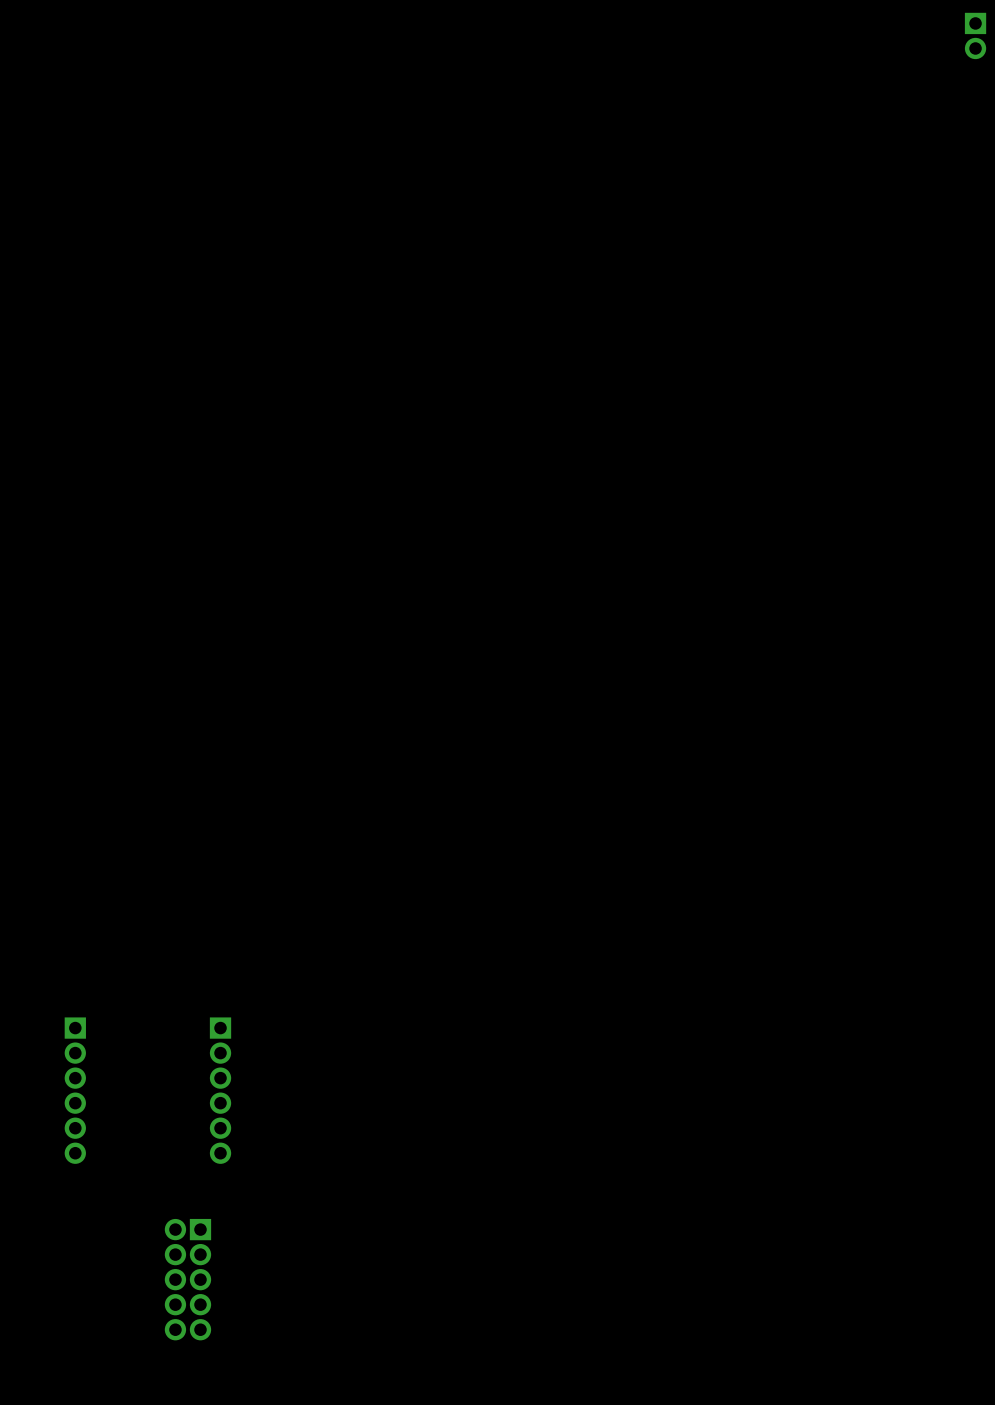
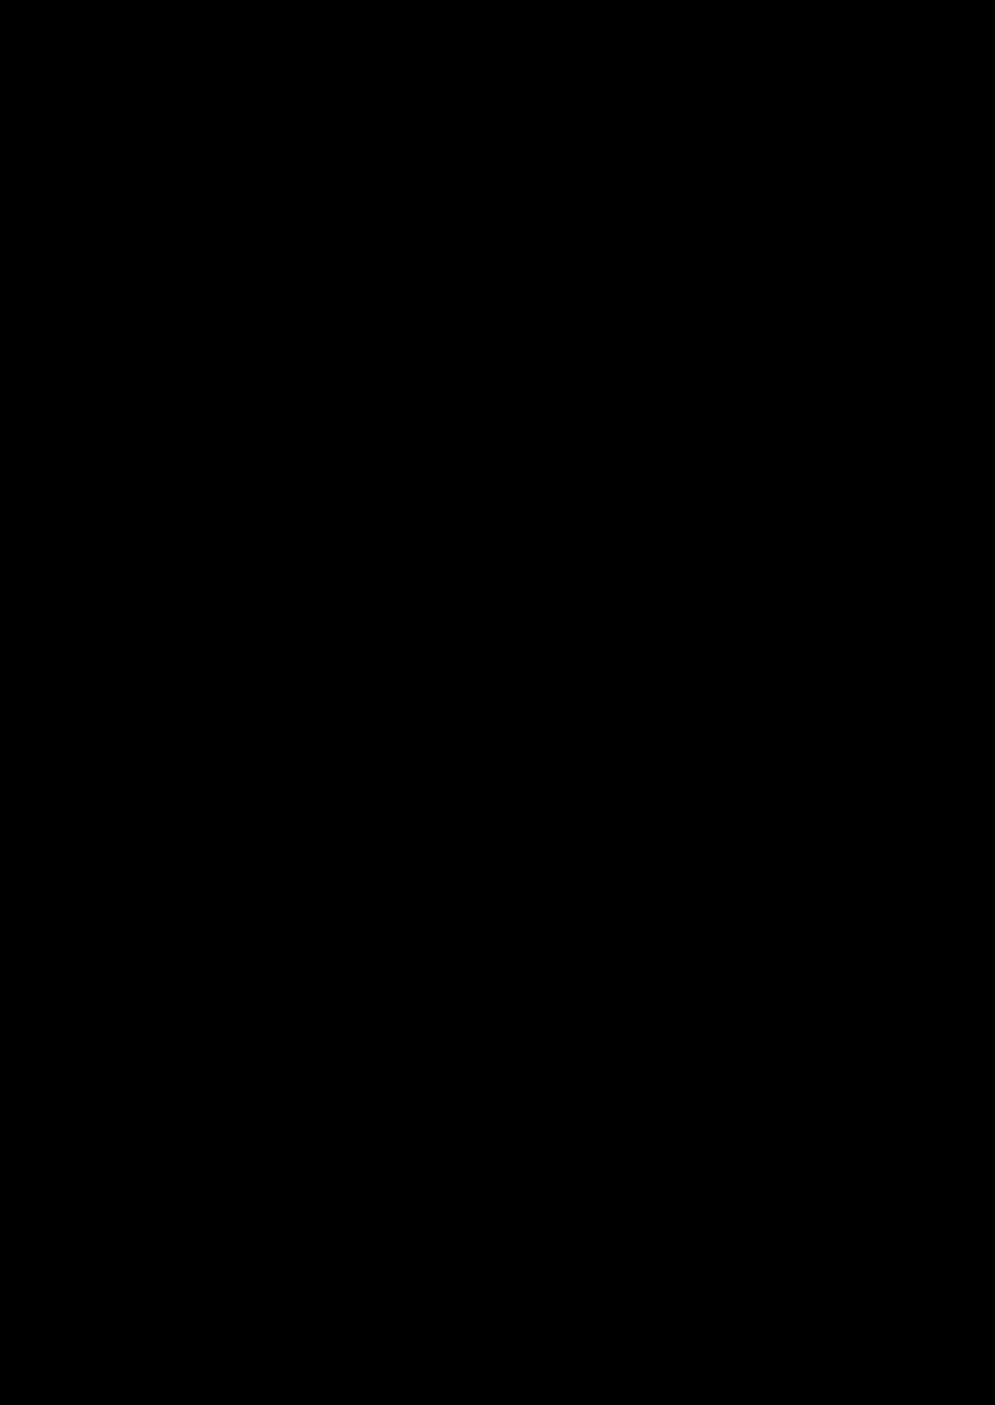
part: (975, 35) -> none
part: (75, 1090) -> none
part: (220, 1090) -> none
part: (187, 1279) -> none

